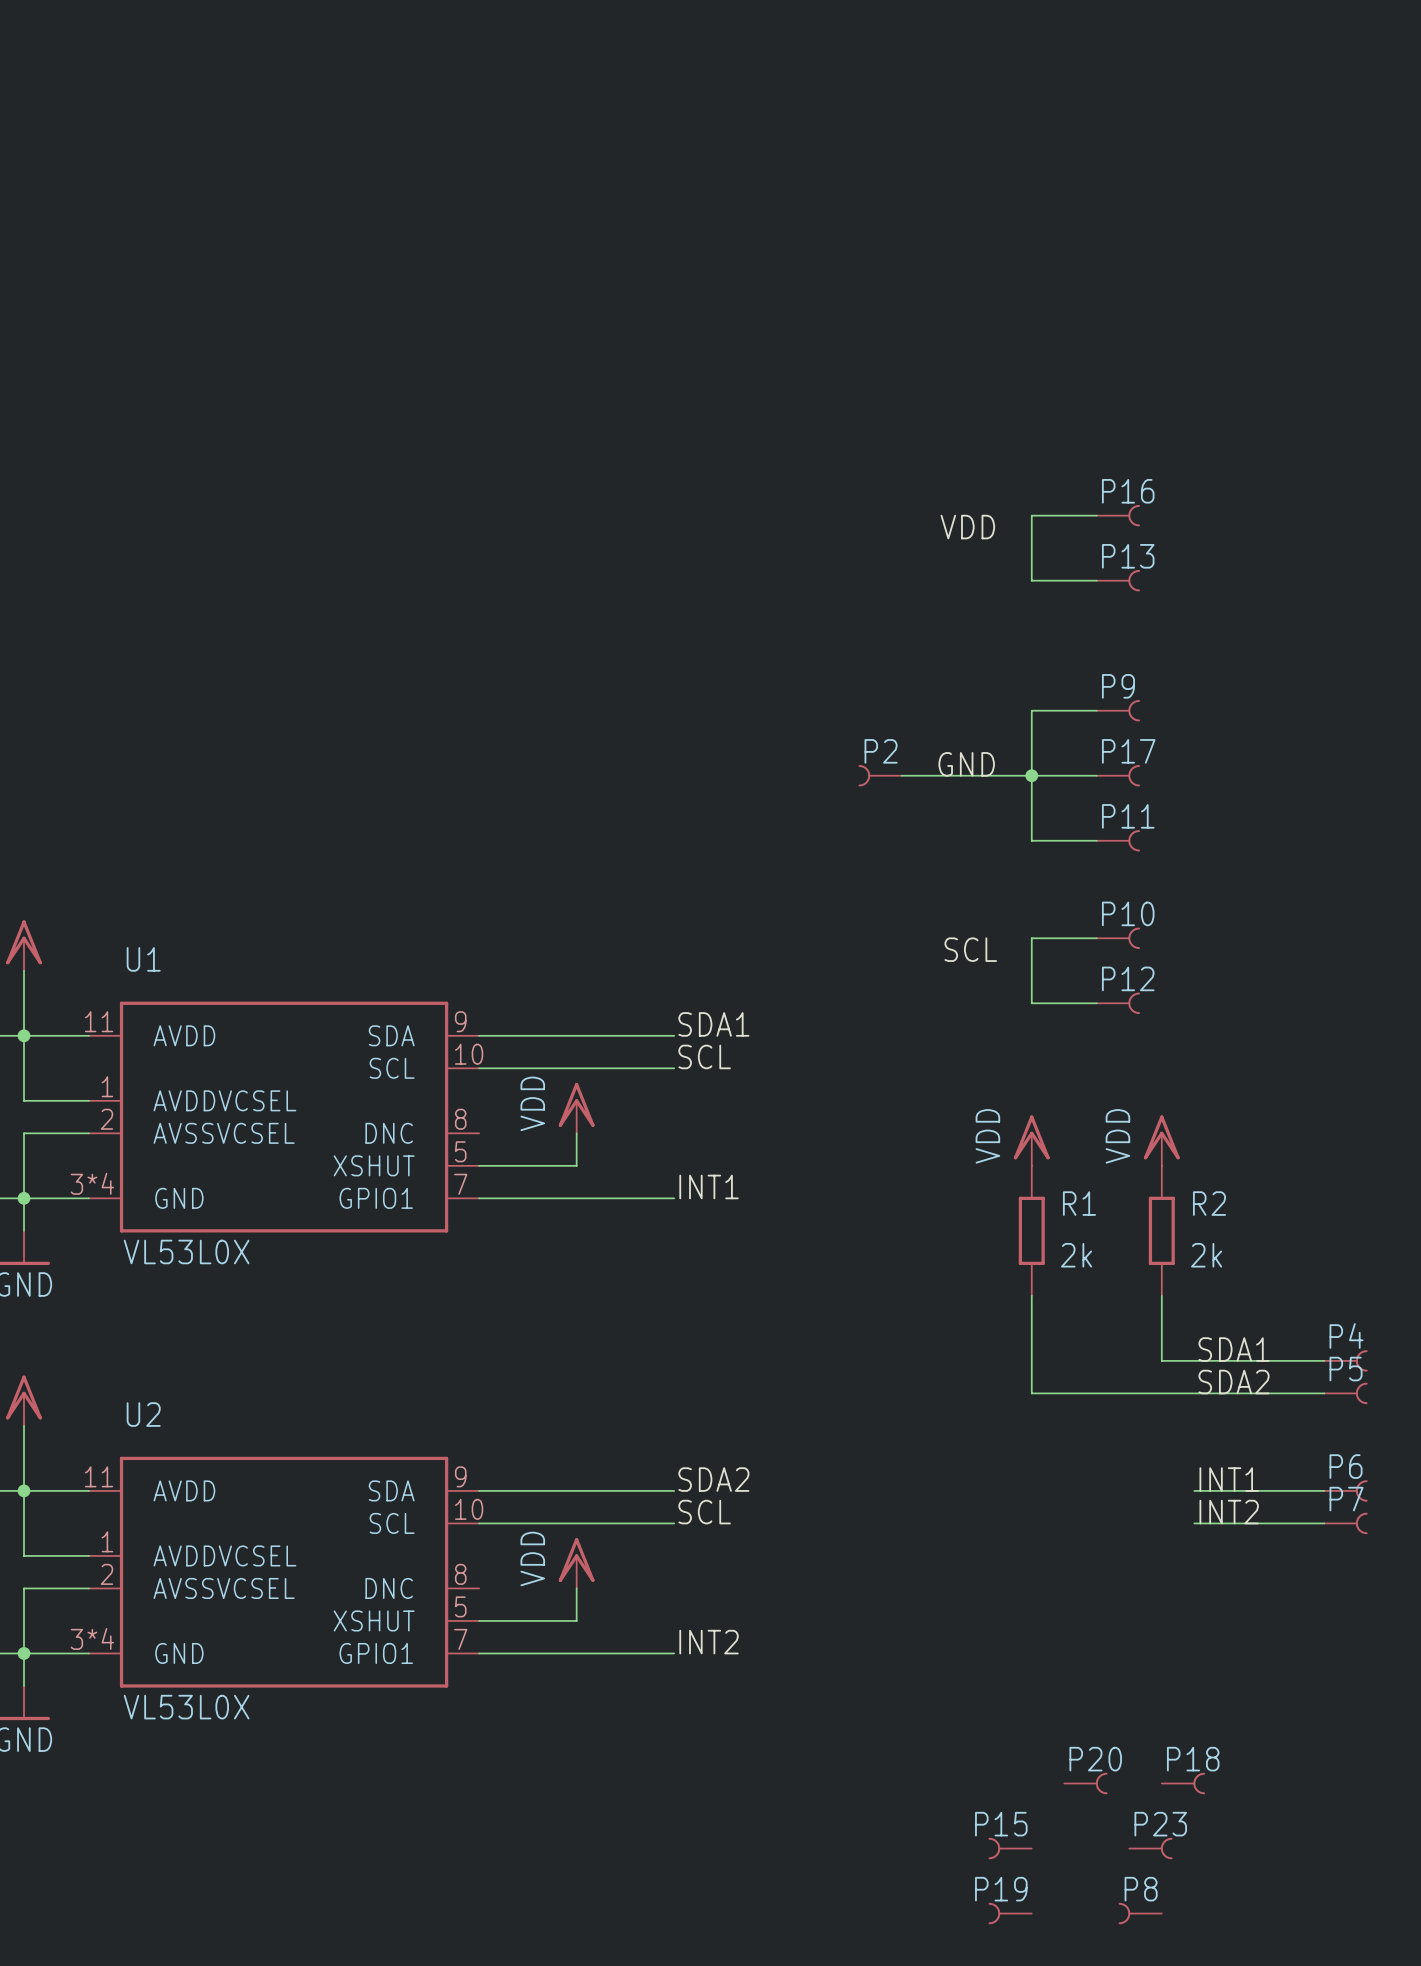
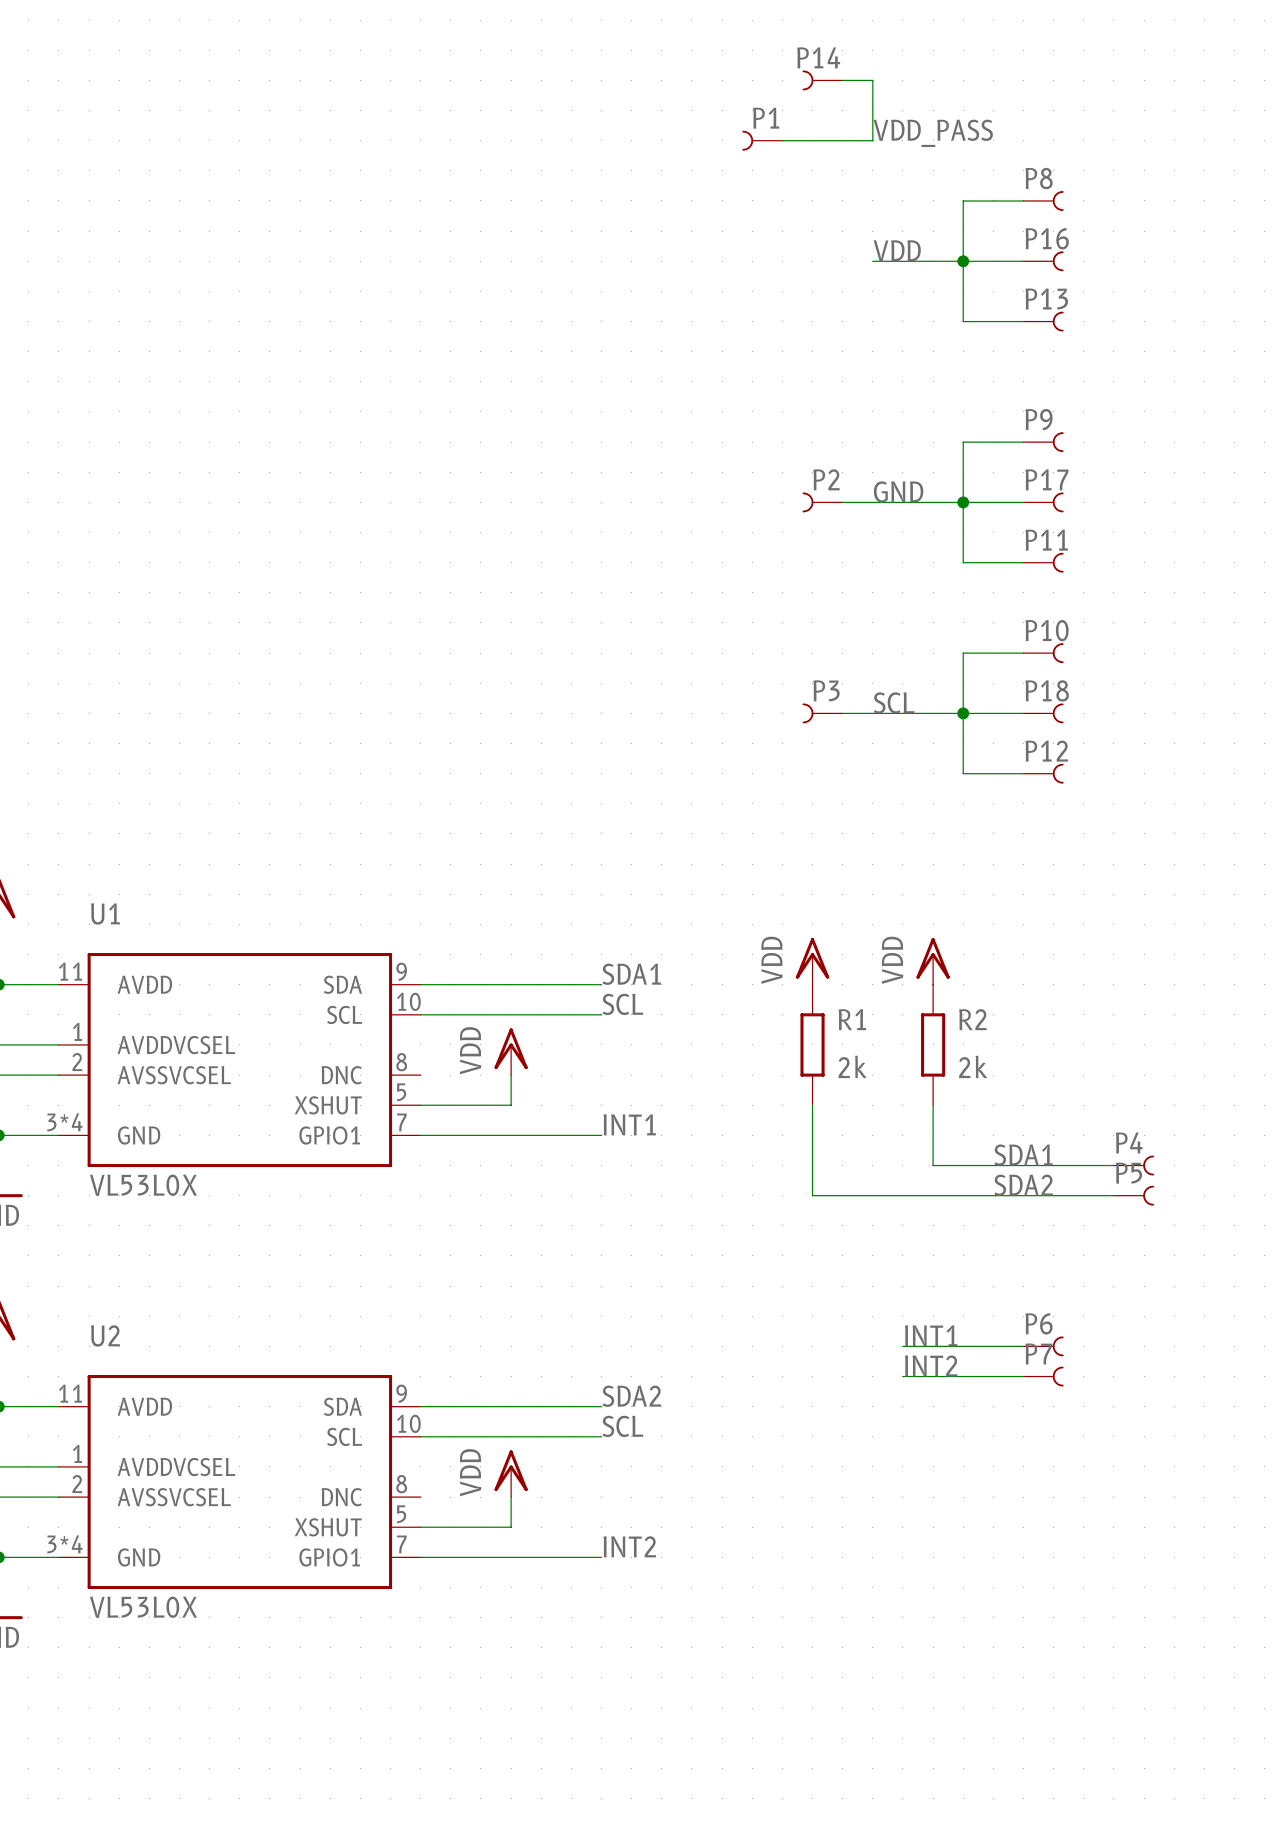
P14: none -> (822, 80)
wire: none -> (842, 80) (872, 80) (872, 140) (782, 140)
label: none -> VDD_PASS (933, 133)
P1: none -> (762, 140)
wire: none -> (1023, 200) (963, 200) (963, 321) (1023, 321)
wire: none -> (872, 261) (1023, 261)
junction: none -> (963, 261)
wire: none -> (842, 502) (933, 502)
wire: (1031, 515) (1031, 580) (1064, 580) -> (1023, 442) (963, 442) (963, 562)
junction: none -> (963, 502)
P16 position: (1118, 515) -> (1043, 261)
label position: VDD (967, 527) -> VDD (897, 250)
P13 position: (1118, 580) -> (1043, 321)
wire: (1096, 710) (1031, 710) (1031, 840) (1096, 840) -> (1023, 653) (963, 653) (963, 773) (1023, 773)
P9 position: (1118, 710) -> (1043, 442)
P3: none -> (822, 713)
label position: GND (966, 764) -> GND (898, 491)
P2 position: (880, 775) -> (822, 502)
wire: (901, 775) (1096, 775) -> (842, 713) (1023, 713)
junction position: (1031, 775) -> (963, 713)
P17 position: (1118, 775) -> (1043, 502)
P11 position: (1118, 840) -> (1043, 562)
wire: (1096, 938) (1031, 938) (1031, 1003) (1096, 1003) -> none
P10 position: (1118, 938) -> (1043, 653)
label position: SCL (970, 949) -> SCL (894, 702)
P12 position: (1118, 1003) -> (1043, 773)
power symbol: none -> VDD (812, 961)
power symbol: none -> VDD (933, 961)
power symbol: VDD (1031, 1140) -> none
power symbol: VDD (1161, 1140) -> none
wire: none -> (812, 1105) (812, 1195) (1113, 1195)
wire: none -> (933, 1105) (933, 1165) (1113, 1165)
R1 position: (1031, 1230) -> (812, 1044)
R2 position: (1161, 1230) -> (933, 1044)
wire: (1031, 1295) (1031, 1393) (1324, 1393) -> none
wire: (1161, 1295) (1161, 1360) (1324, 1360) -> none
label position: SDA1 (1234, 1349) -> SDA1 (1023, 1155)
P4 position: (1345, 1360) -> (1133, 1165)
label position: SDA2 (1234, 1382) -> SDA2 (1023, 1185)
P5 position: (1345, 1393) -> (1133, 1195)
label position: INT1 (1229, 1479) -> INT1 (931, 1335)
wire: (1194, 1490) (1324, 1490) -> (902, 1346) (1023, 1346)
P6 position: (1345, 1490) -> (1043, 1346)
label position: INT2 (1229, 1512) -> INT2 (931, 1365)
wire: (1194, 1523) (1324, 1523) -> (902, 1376) (1023, 1376)
P7 position: (1345, 1523) -> (1043, 1376)
P20: (1085, 1783) -> none
P18 position: (1183, 1783) -> (1043, 713)
P15: (1010, 1848) -> none
P23: (1150, 1848) -> none
P19: (1010, 1913) -> none
P8 rotation: 0° (1124, 1913) -> 180° (1058, 200)
P8 position: (1140, 1913) -> (1043, 200)

